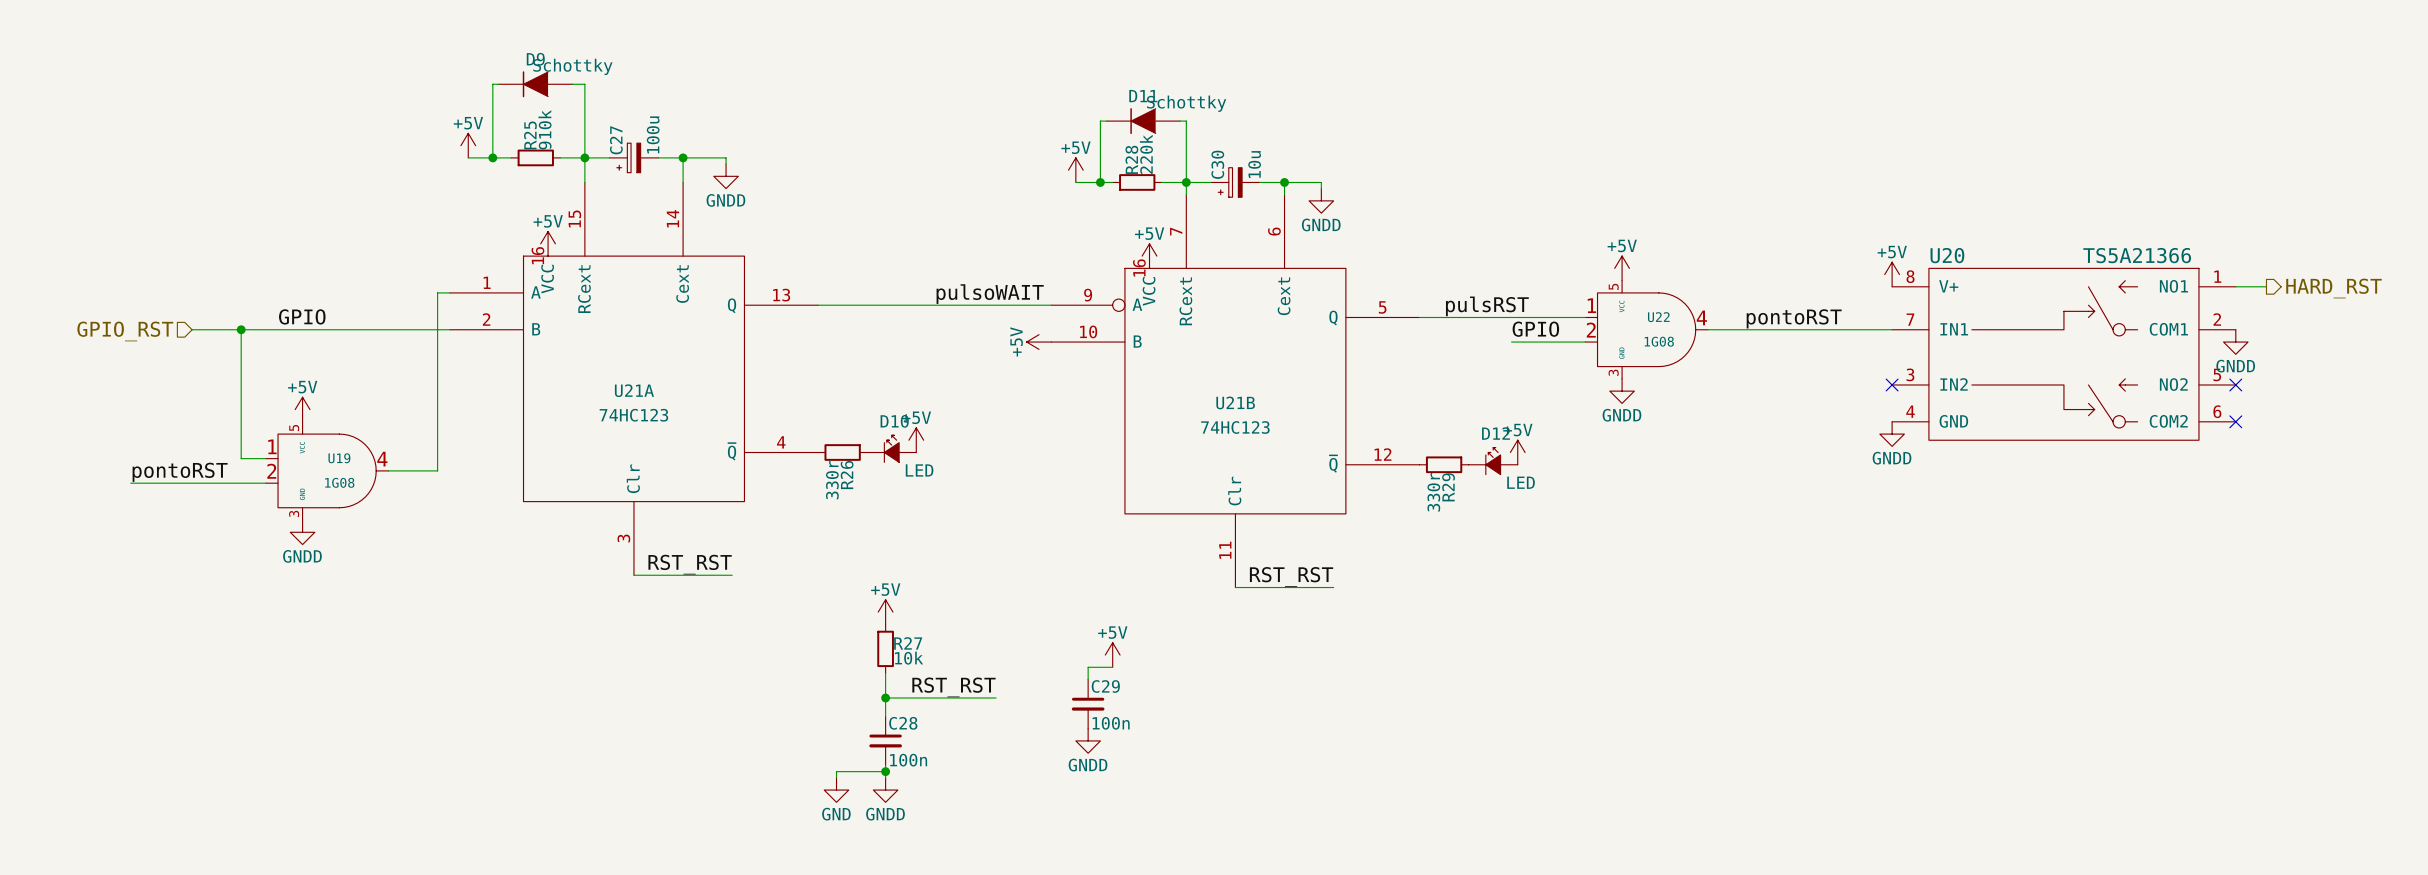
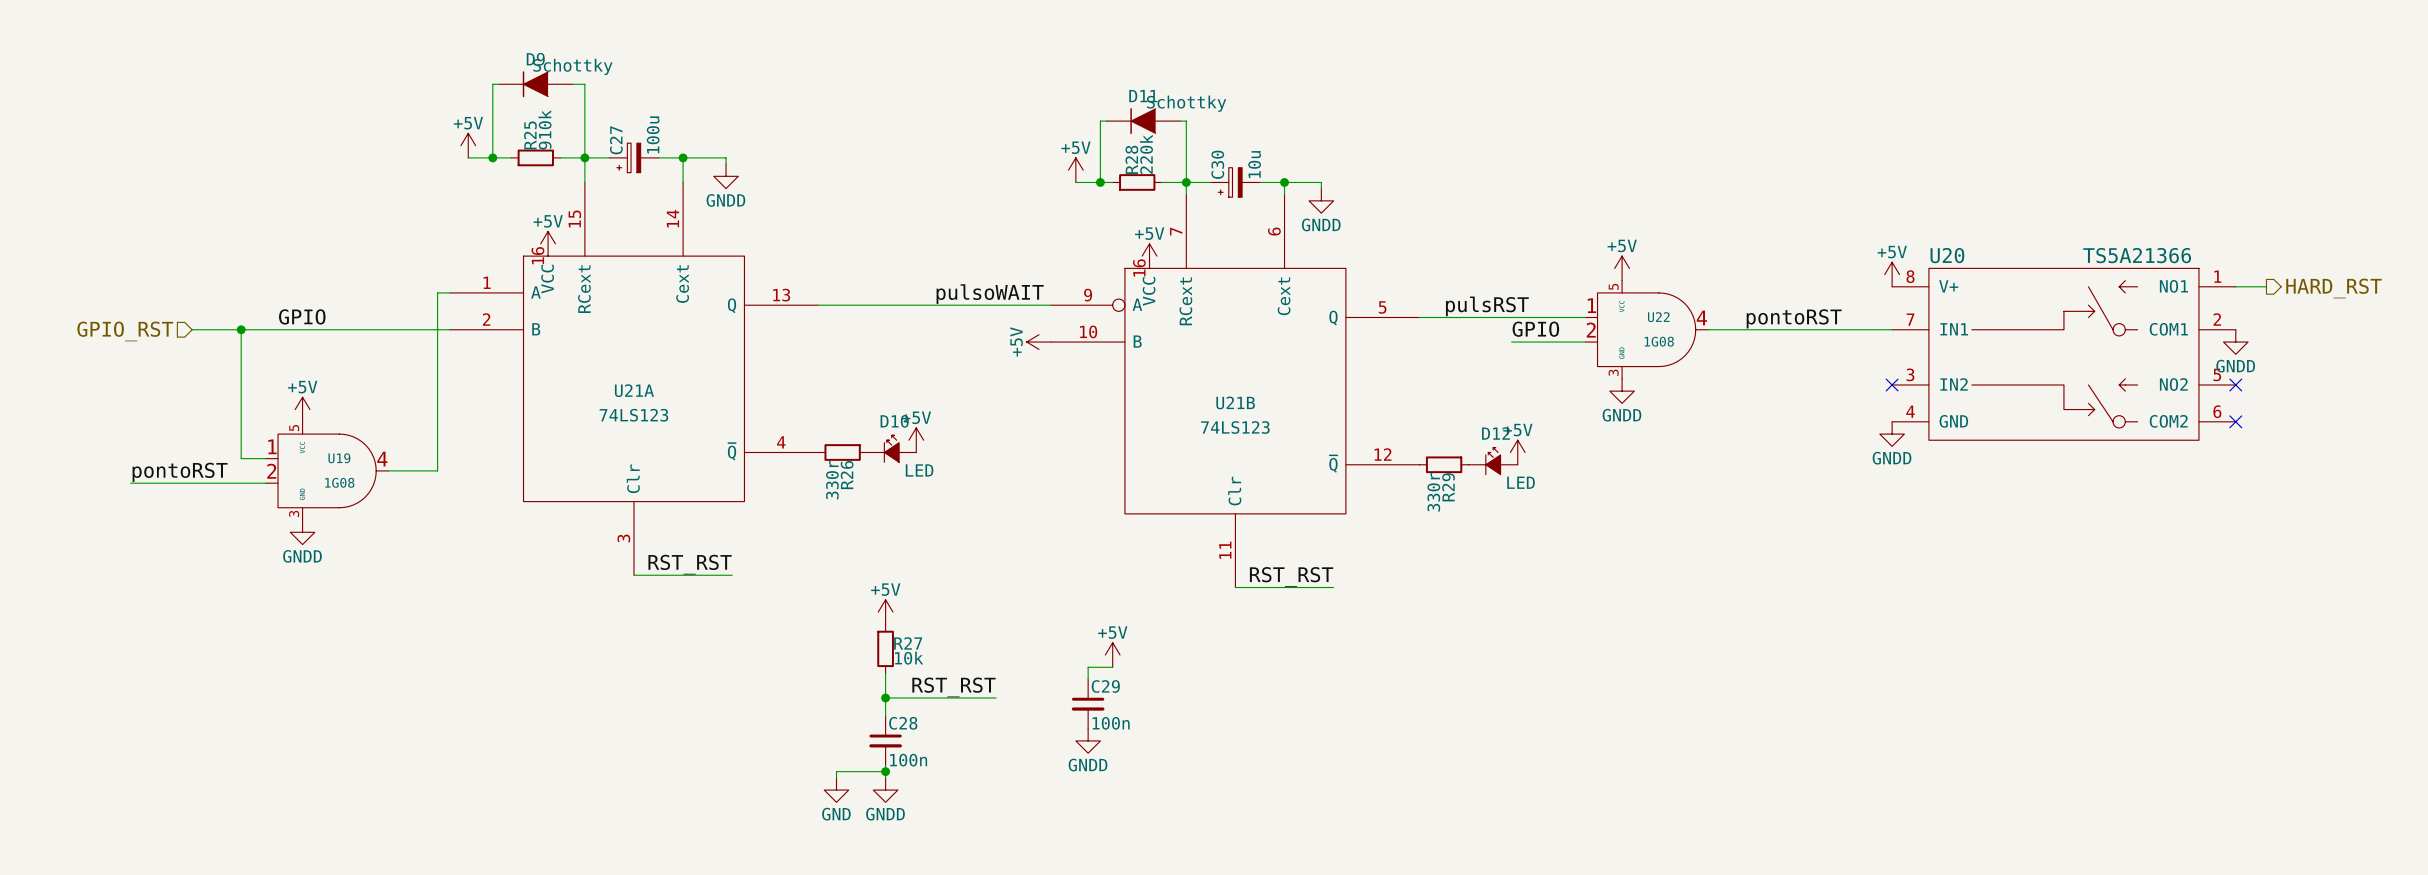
U21A value: 74HC123 (633, 415) -> 74LS123 (633, 415)
U21B value: 74HC123 (1235, 427) -> 74LS123 (1235, 427)

